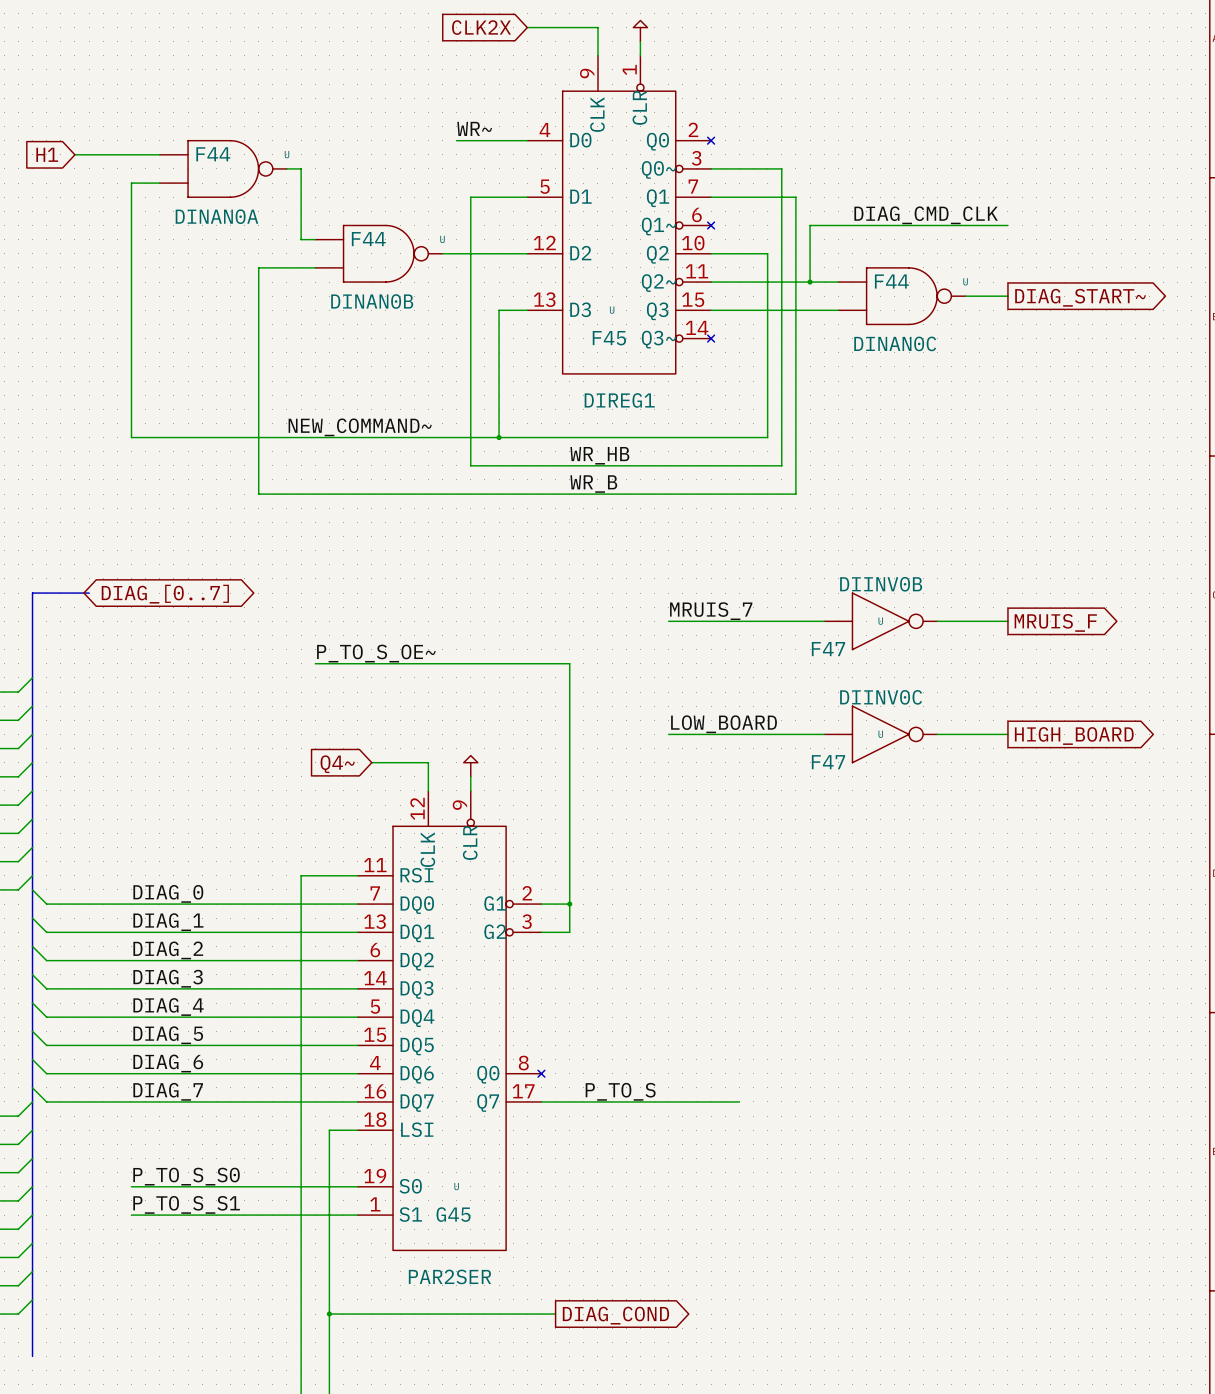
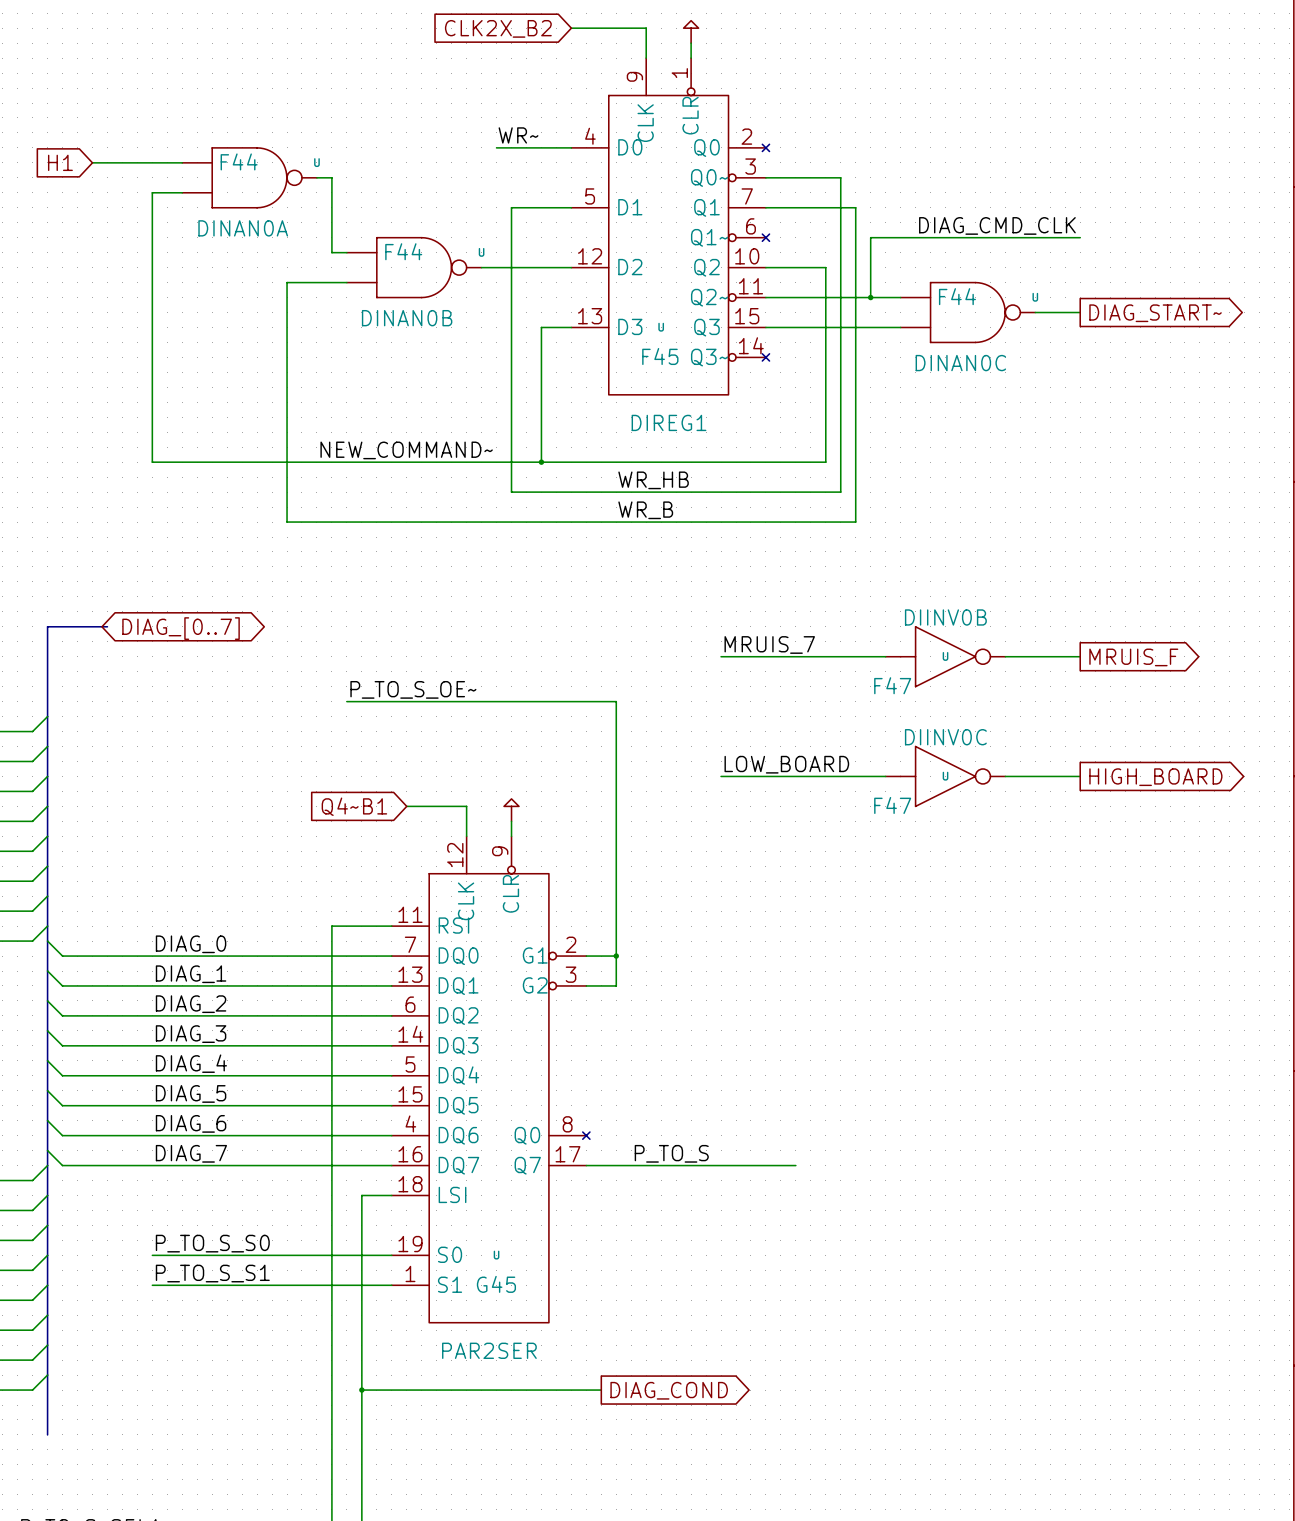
global label: CLK2X (481, 27) -> CLK2X_B2 (498, 28)
global label: Q4~ (337, 764) -> Q4~B1 (354, 806)

